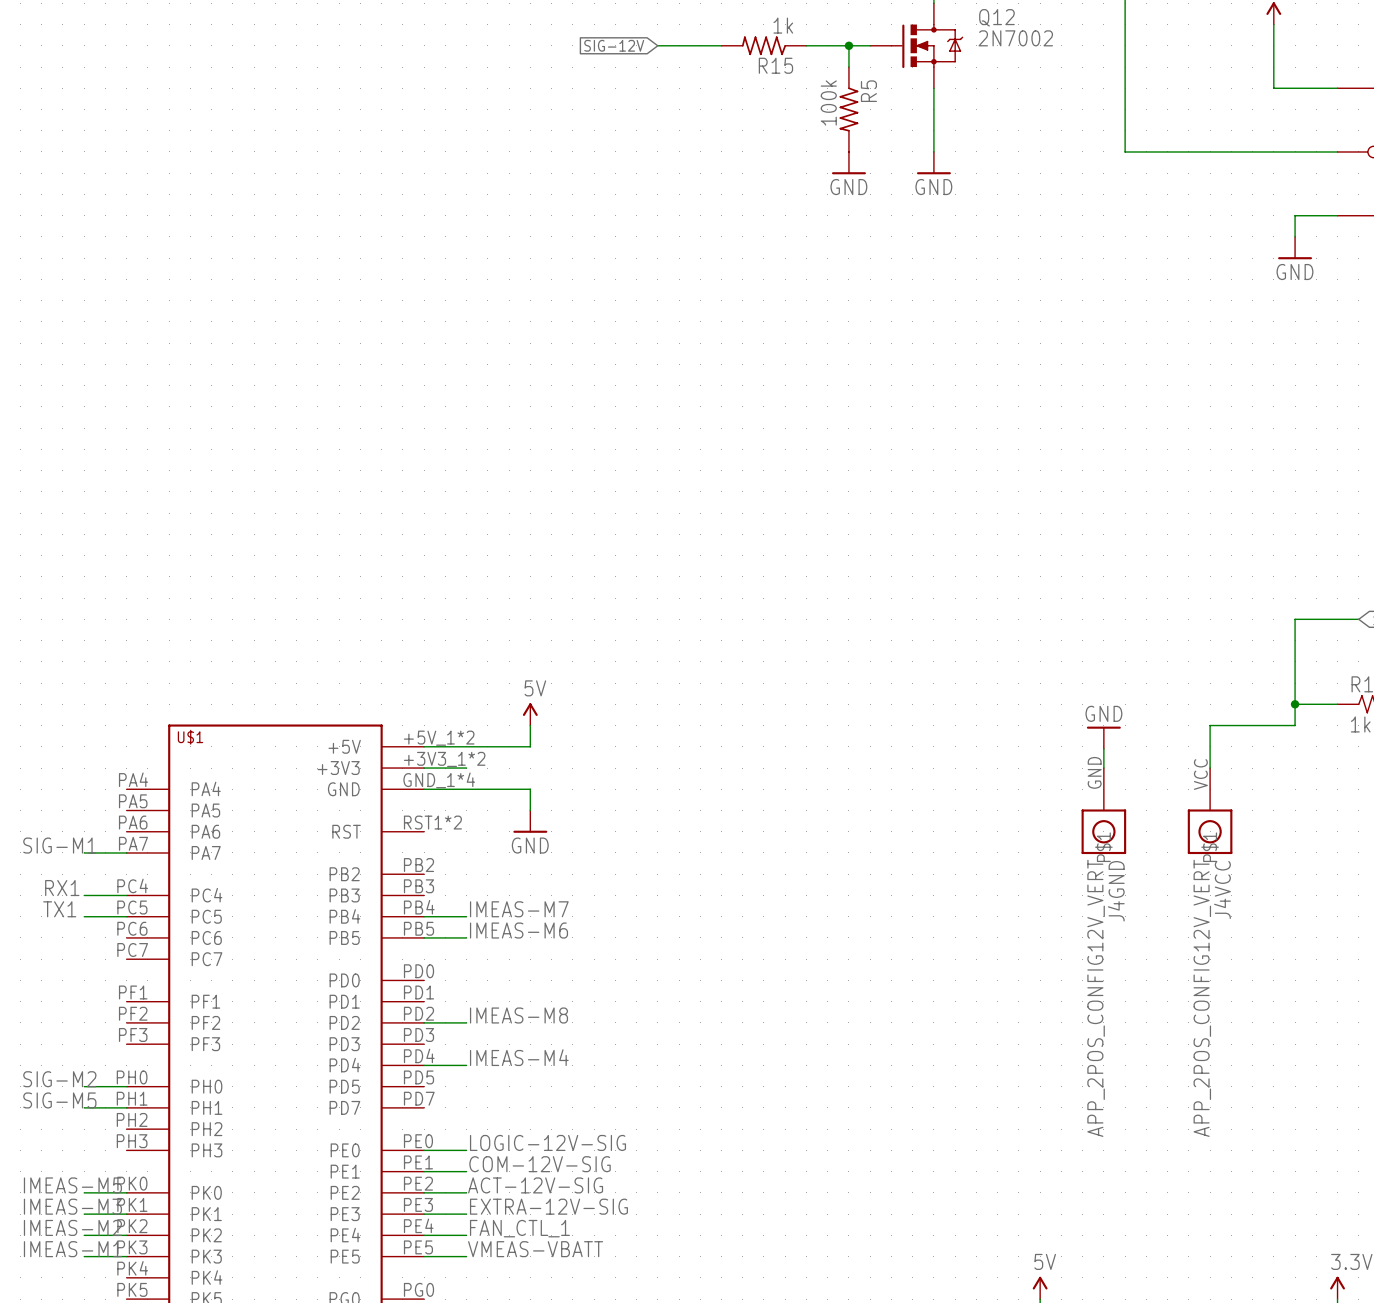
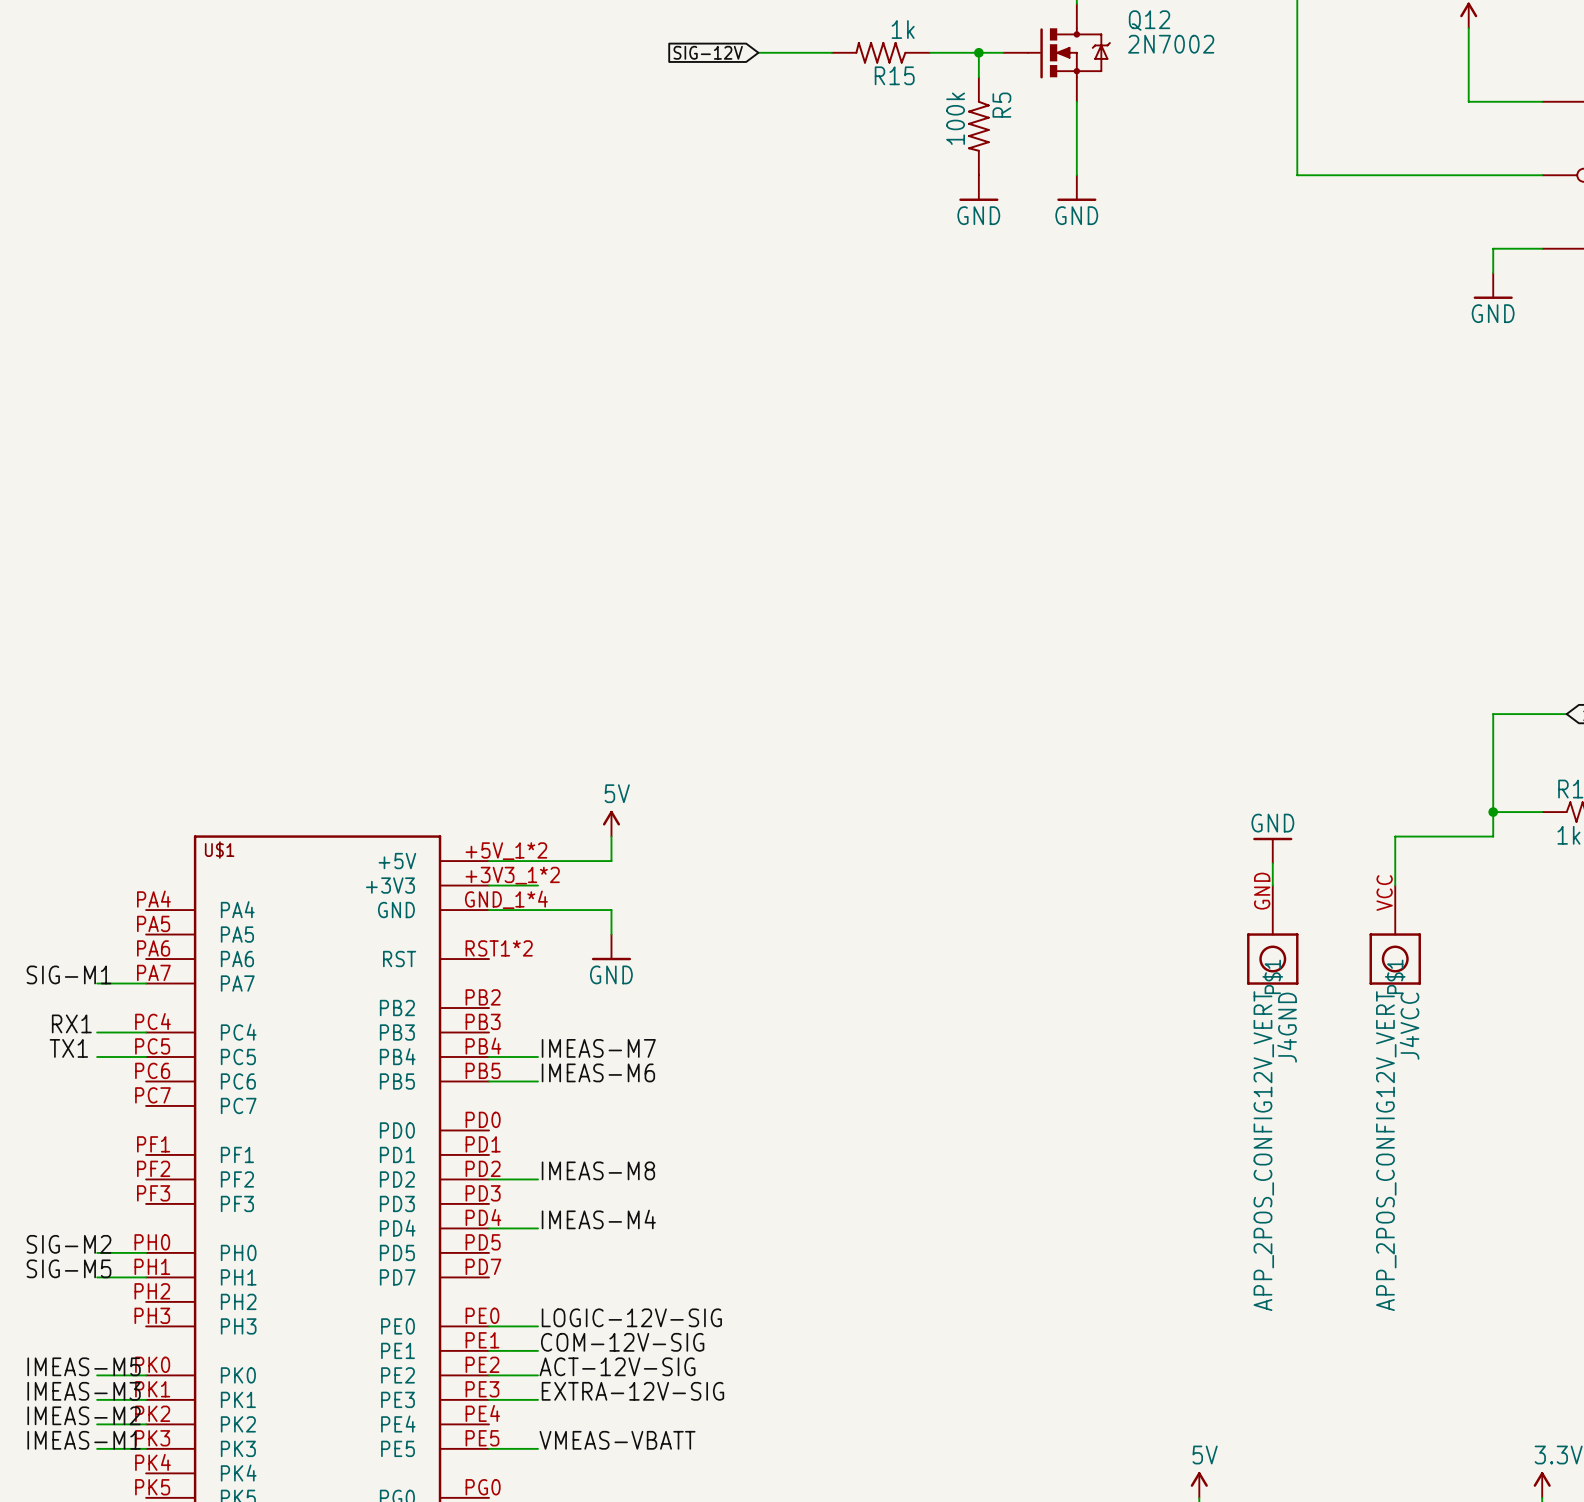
label: FAN_CTL_1 (519, 1228) -> none
wire: (424, 1235) (466, 1235) -> none

